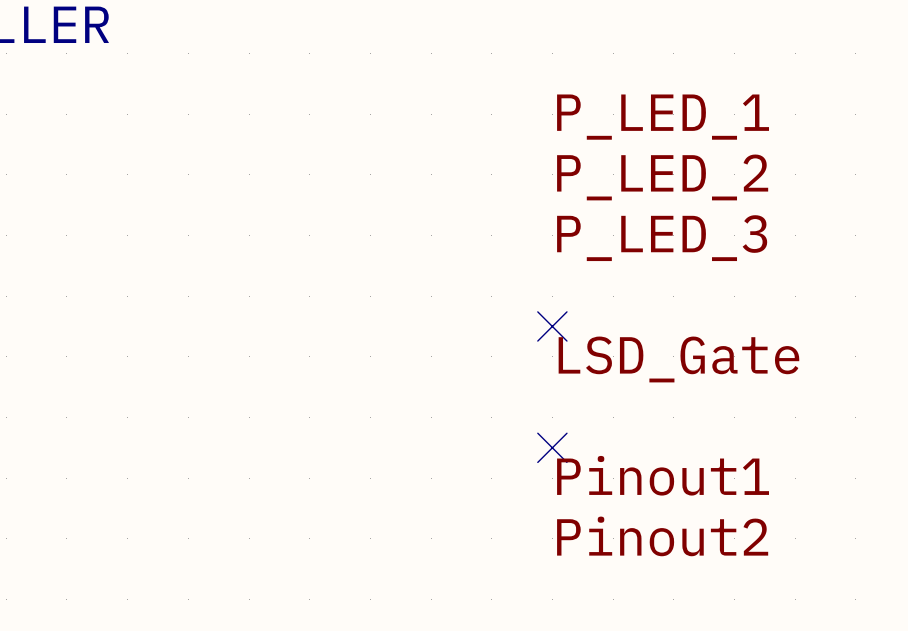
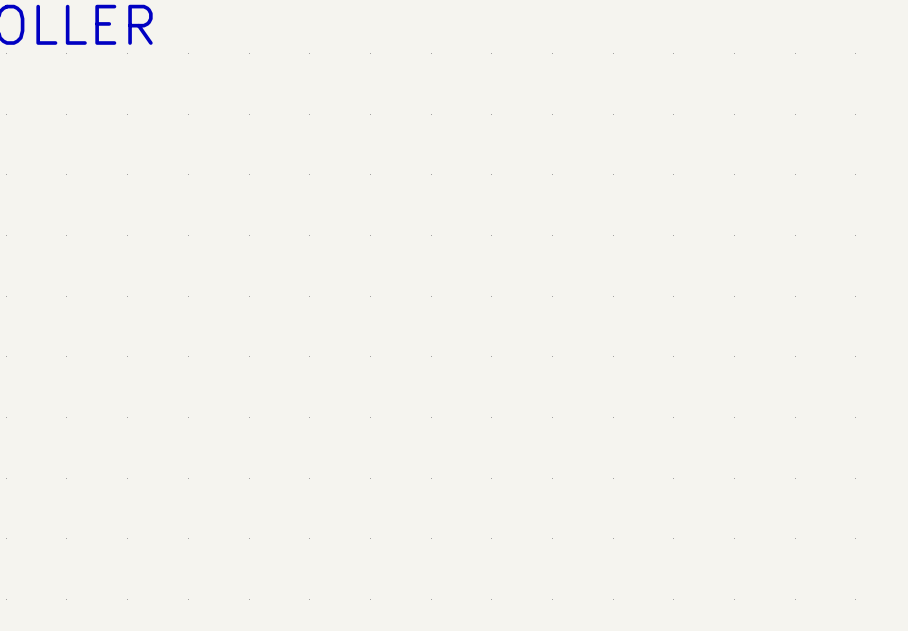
label: P_LED_1 (663, 117) -> none
label: P_LED_2 (662, 177) -> none
label: P_LED_3 (662, 238) -> none
no-connect mark: (552, 326) -> none
label: LSD_Gate (678, 359) -> none
no-connect mark: (552, 447) -> none
label: Pinout1 (663, 475) -> none
label: Pinout2 (662, 536) -> none

